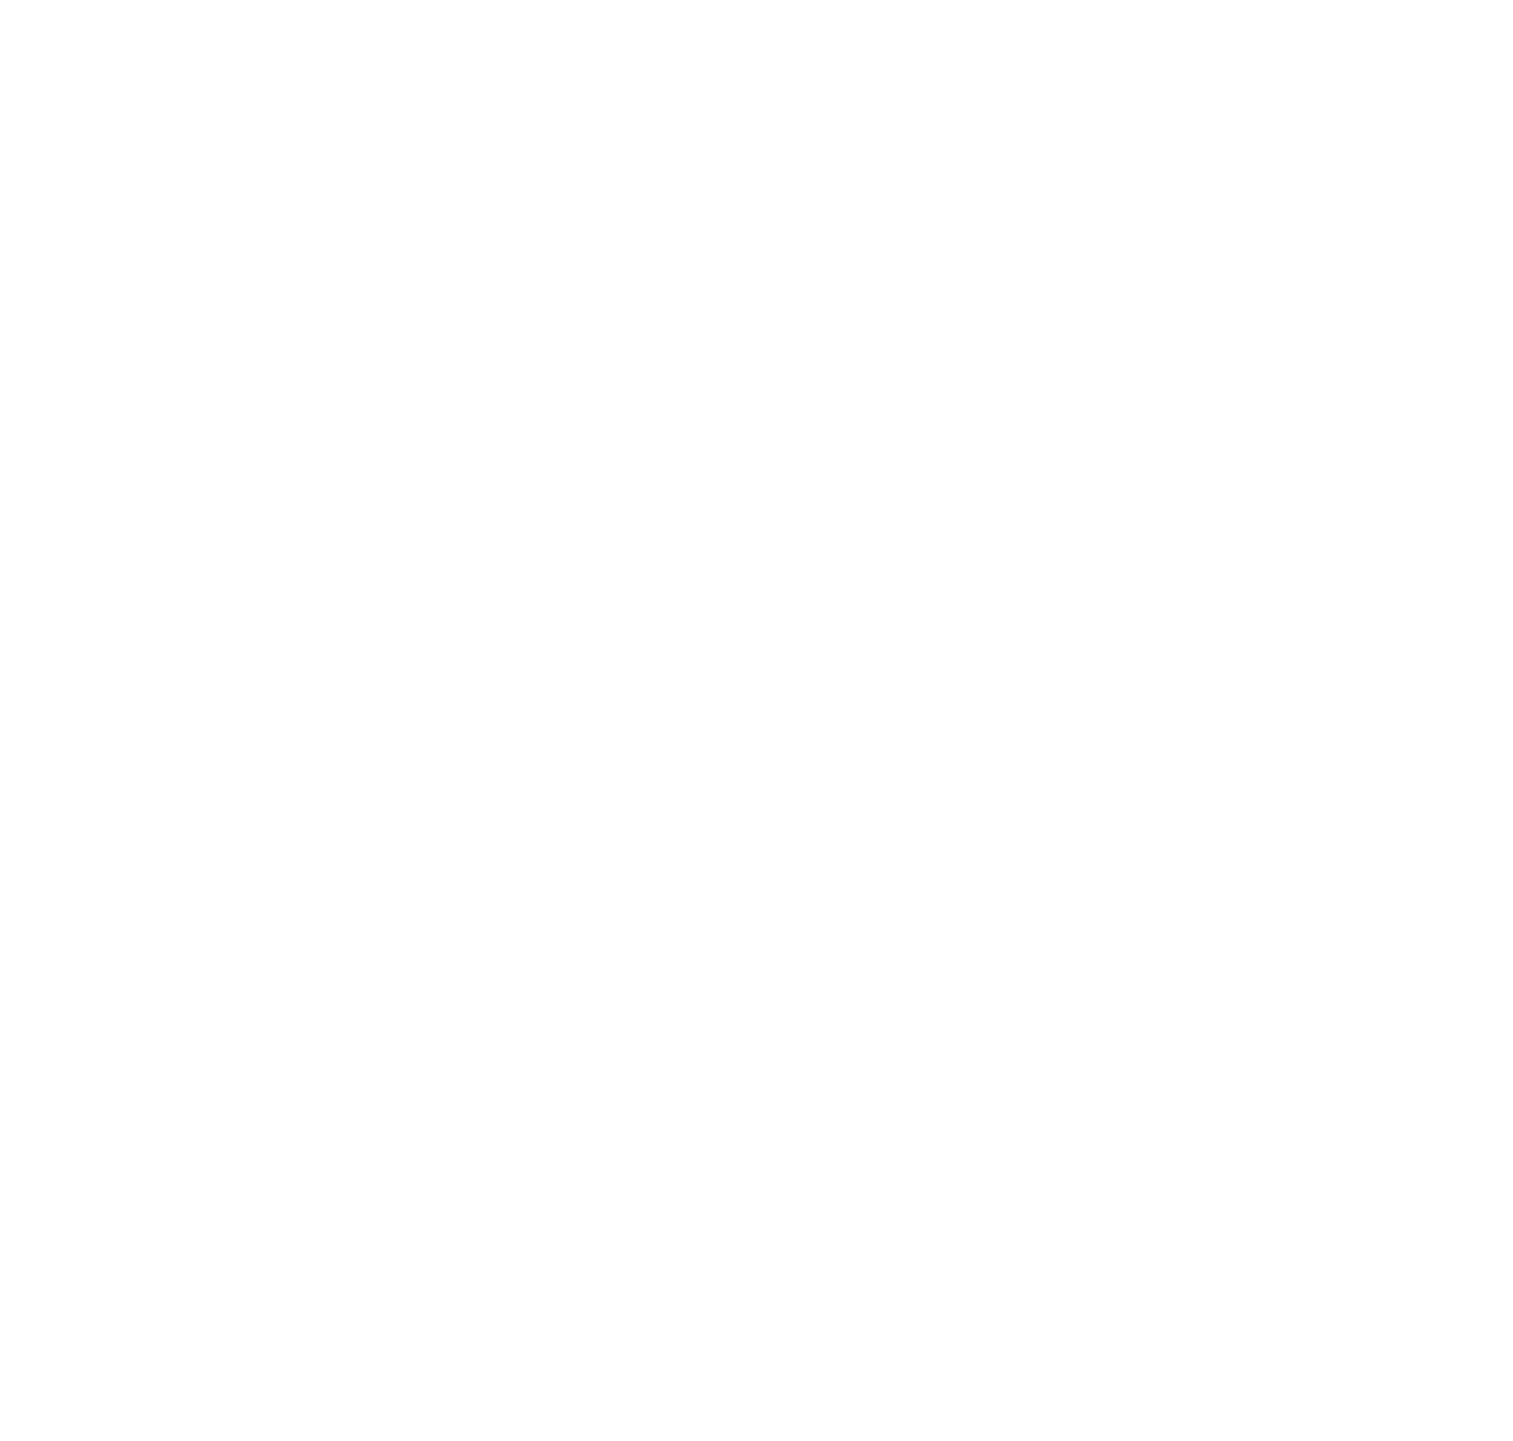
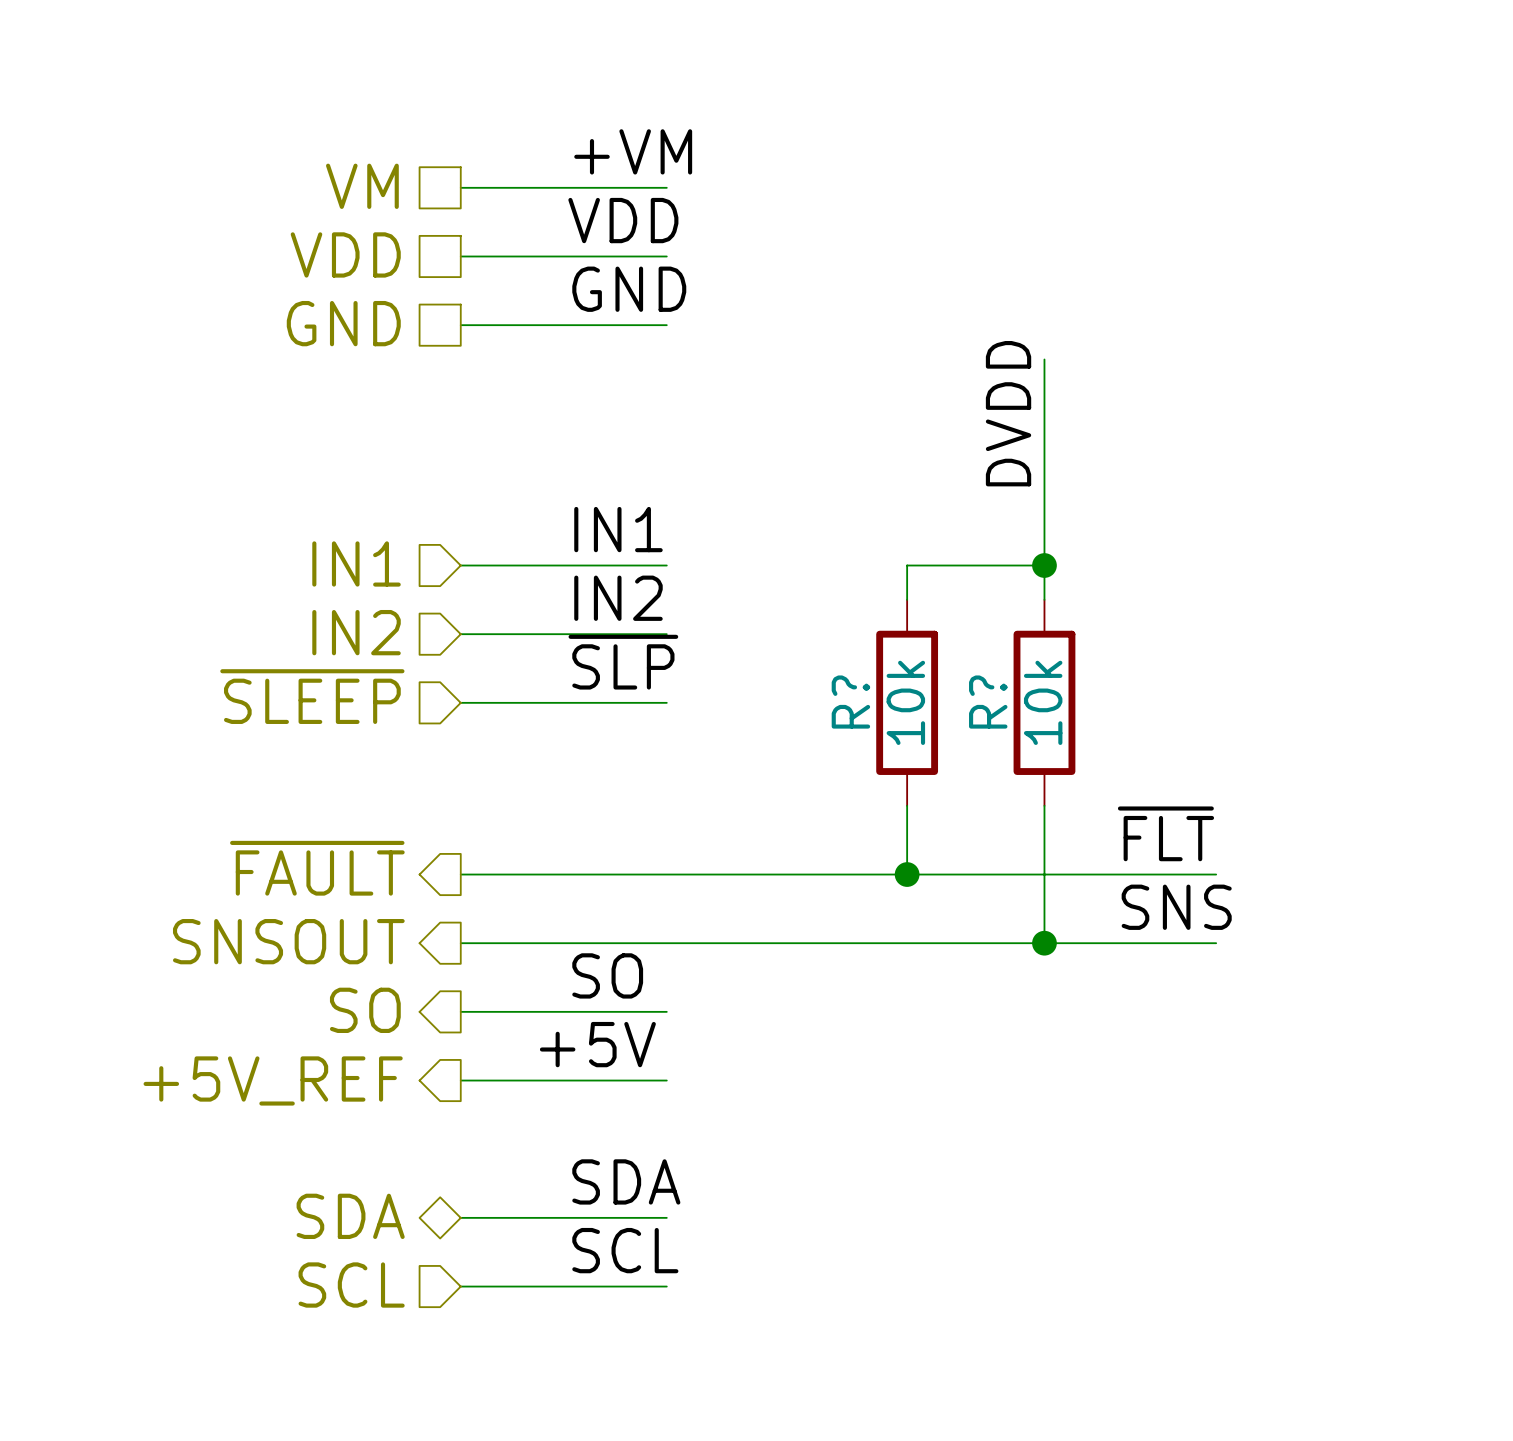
label: none -> +VM (633, 151)
hierarchical label: none -> VM (362, 186)
wire: none -> (460, 187) (666, 187)
label: none -> VDD (623, 220)
hierarchical label: none -> VDD (345, 254)
wire: none -> (460, 256) (666, 256)
label: none -> GND (629, 289)
hierarchical label: none -> GND (343, 323)
wire: none -> (460, 325) (666, 325)
wire: none -> (1044, 359) (1044, 599)
label: none -> DVDD (1008, 413)
label: none -> IN1 (618, 529)
hierarchical label: none -> IN1 (356, 563)
wire: none -> (460, 565) (666, 565)
wire: none -> (1044, 565) (907, 565) (907, 599)
junction: none -> (1044, 565)
label: none -> IN2 (618, 598)
hierarchical label: none -> IN2 (356, 632)
wire: none -> (460, 634) (666, 634)
label: none -> ~{SLP} (623, 662)
hierarchical label: none -> ~{SLEEP} (312, 696)
wire: none -> (460, 702) (666, 702)
R?: none -> 10k (907, 702)
R?: none -> 10k (1044, 702)
wire: none -> (907, 805) (907, 874)
wire: none -> (1044, 805) (1044, 943)
label: none -> ~{FLT} (1165, 833)
hierarchical label: none -> ~{FAULT} (317, 868)
wire: none -> (460, 874) (1216, 874)
junction: none -> (907, 874)
label: none -> SNS (1176, 907)
hierarchical label: none -> SNSOUT (288, 941)
wire: none -> (460, 943) (1216, 943)
junction: none -> (1044, 943)
label: none -> SO (607, 975)
hierarchical label: none -> SO (365, 1010)
wire: none -> (460, 1011) (666, 1011)
label: none -> +5V (597, 1044)
hierarchical label: none -> +5V_REF (273, 1080)
wire: none -> (460, 1080) (666, 1080)
label: none -> SDA (626, 1181)
hierarchical label: none -> SDA (350, 1216)
wire: none -> (460, 1217) (666, 1217)
label: none -> SCL (625, 1250)
hierarchical label: none -> SCL (351, 1285)
wire: none -> (460, 1286) (666, 1286)

